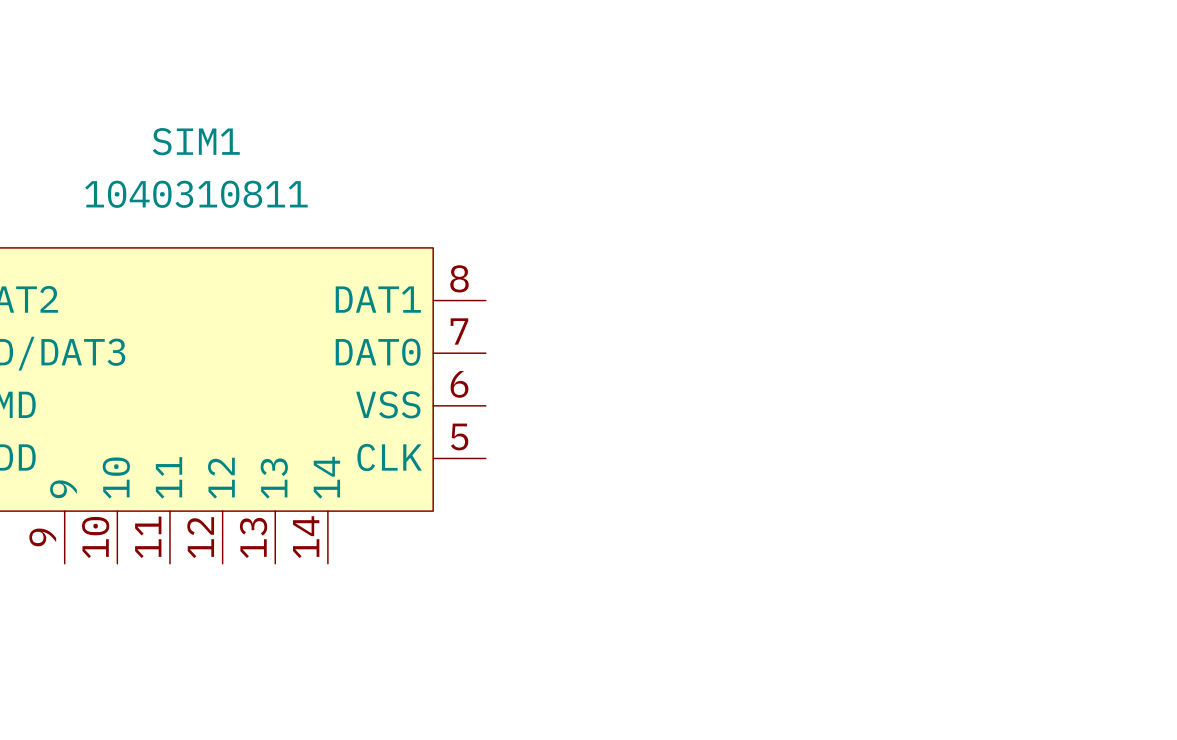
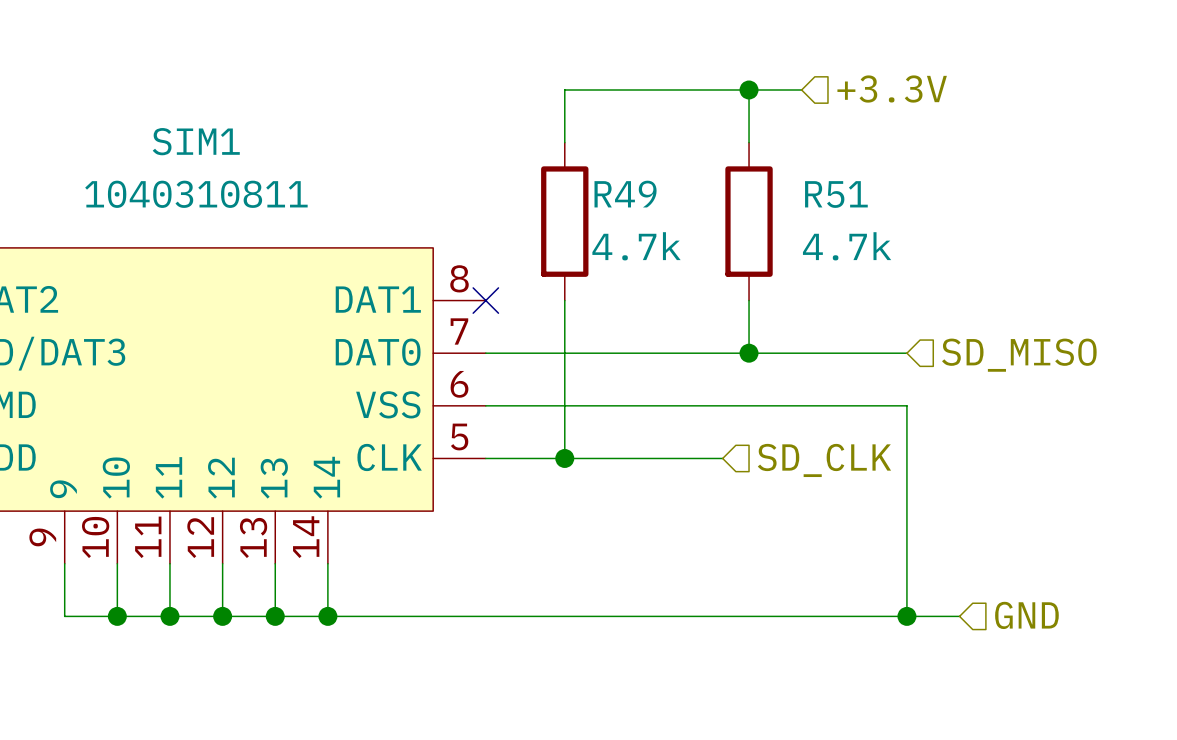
hierarchical label: none -> +3.3V (892, 89)
wire: none -> (749, 90) (749, 142)
junction: none -> (749, 90)
wire: none -> (801, 90) (564, 90) (564, 142)
R49: none -> 4.7k (564, 221)
R51: none -> 4.7k (749, 221)
no-connect mark: none -> (485, 300)
wire: none -> (564, 300) (564, 458)
wire: none -> (749, 300) (749, 353)
wire: none -> (485, 353) (906, 353)
junction: none -> (749, 353)
hierarchical label: none -> SD_MISO (1019, 355)
wire: none -> (485, 405) (906, 405) (906, 616)
wire: none -> (485, 458) (722, 458)
junction: none -> (564, 458)
hierarchical label: none -> SD_CLK (824, 460)
wire: none -> (64, 563) (64, 616) (959, 616)
wire: none -> (117, 563) (117, 616)
wire: none -> (169, 563) (169, 616)
wire: none -> (222, 563) (222, 616)
wire: none -> (275, 563) (275, 616)
wire: none -> (327, 563) (327, 616)
hierarchical label: none -> GND (1026, 615)
junction: none -> (117, 616)
junction: none -> (169, 616)
junction: none -> (222, 616)
junction: none -> (275, 616)
junction: none -> (327, 616)
junction: none -> (906, 616)

